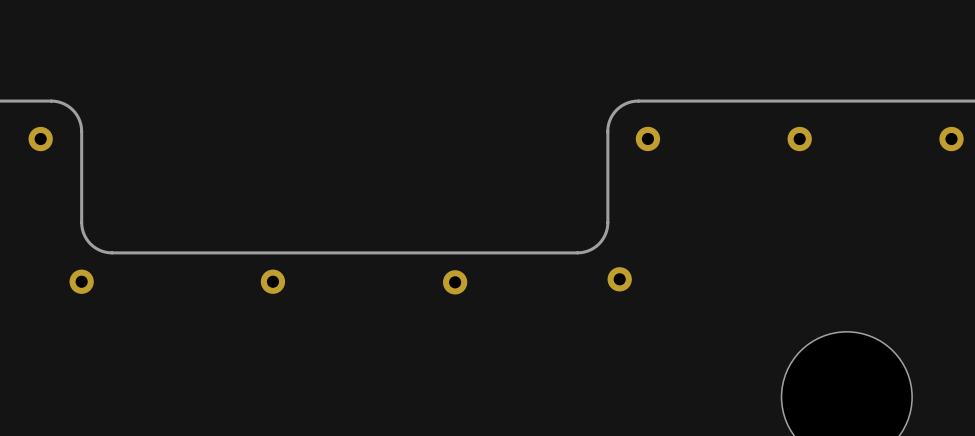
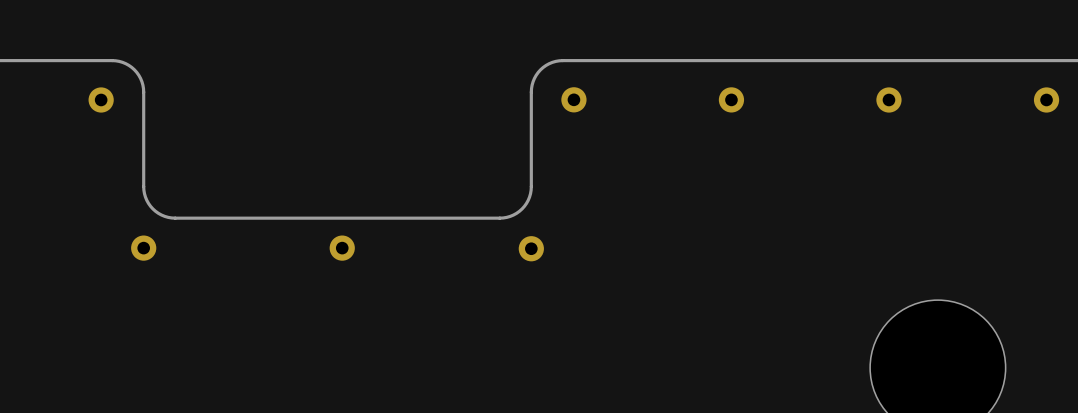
board edge: (638, 101) (628, 102) (619, 107) (612, 115) (608, 124) (607, 225) (604, 235) (596, 246) (587, 251) (577, 252) (424, 252) -> (721, 60) (562, 60) (552, 62) (543, 67) (534, 78) (531, 88) (530, 193) (526, 203) (519, 211) (510, 216) (499, 218)
via: none -> (573, 99)
via: (619, 279) -> none

